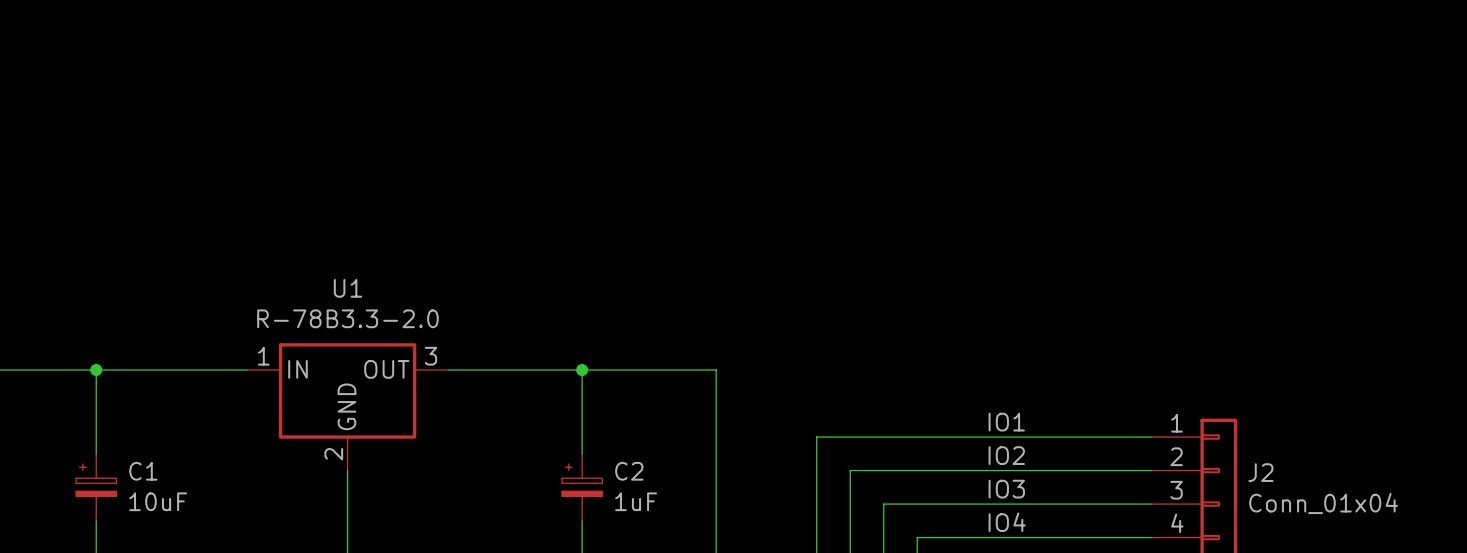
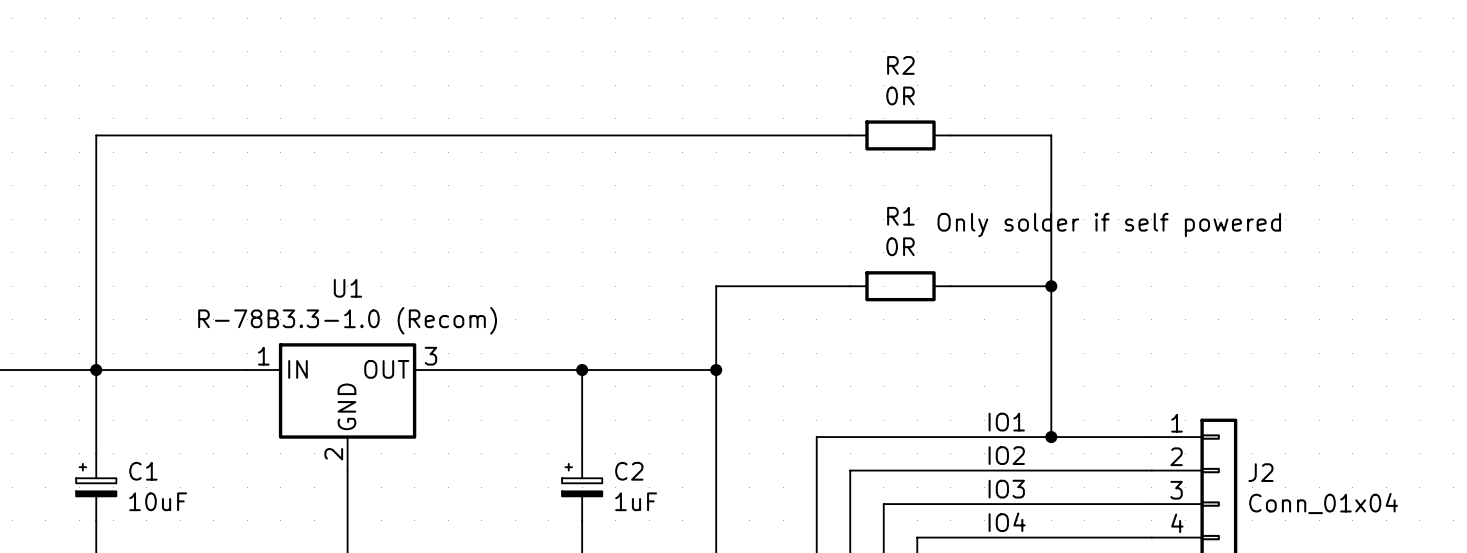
wire: none -> (850, 135) (96, 135) (96, 370)
R2: none -> 0R (900, 135)
wire: none -> (950, 135) (1051, 135) (1051, 437)
text: none -> Only solder if self powered (1109, 225)
wire: none -> (850, 286) (716, 286) (716, 370)
R1: none -> 0R (900, 286)
wire: none -> (950, 286) (1051, 286)
junction: none -> (1051, 286)
U1 value: R-78B3.3-2.0 (347, 318) -> R-78B3.3-1.0 (Recom) (347, 320)
junction: none -> (716, 370)
junction: none -> (1051, 437)

